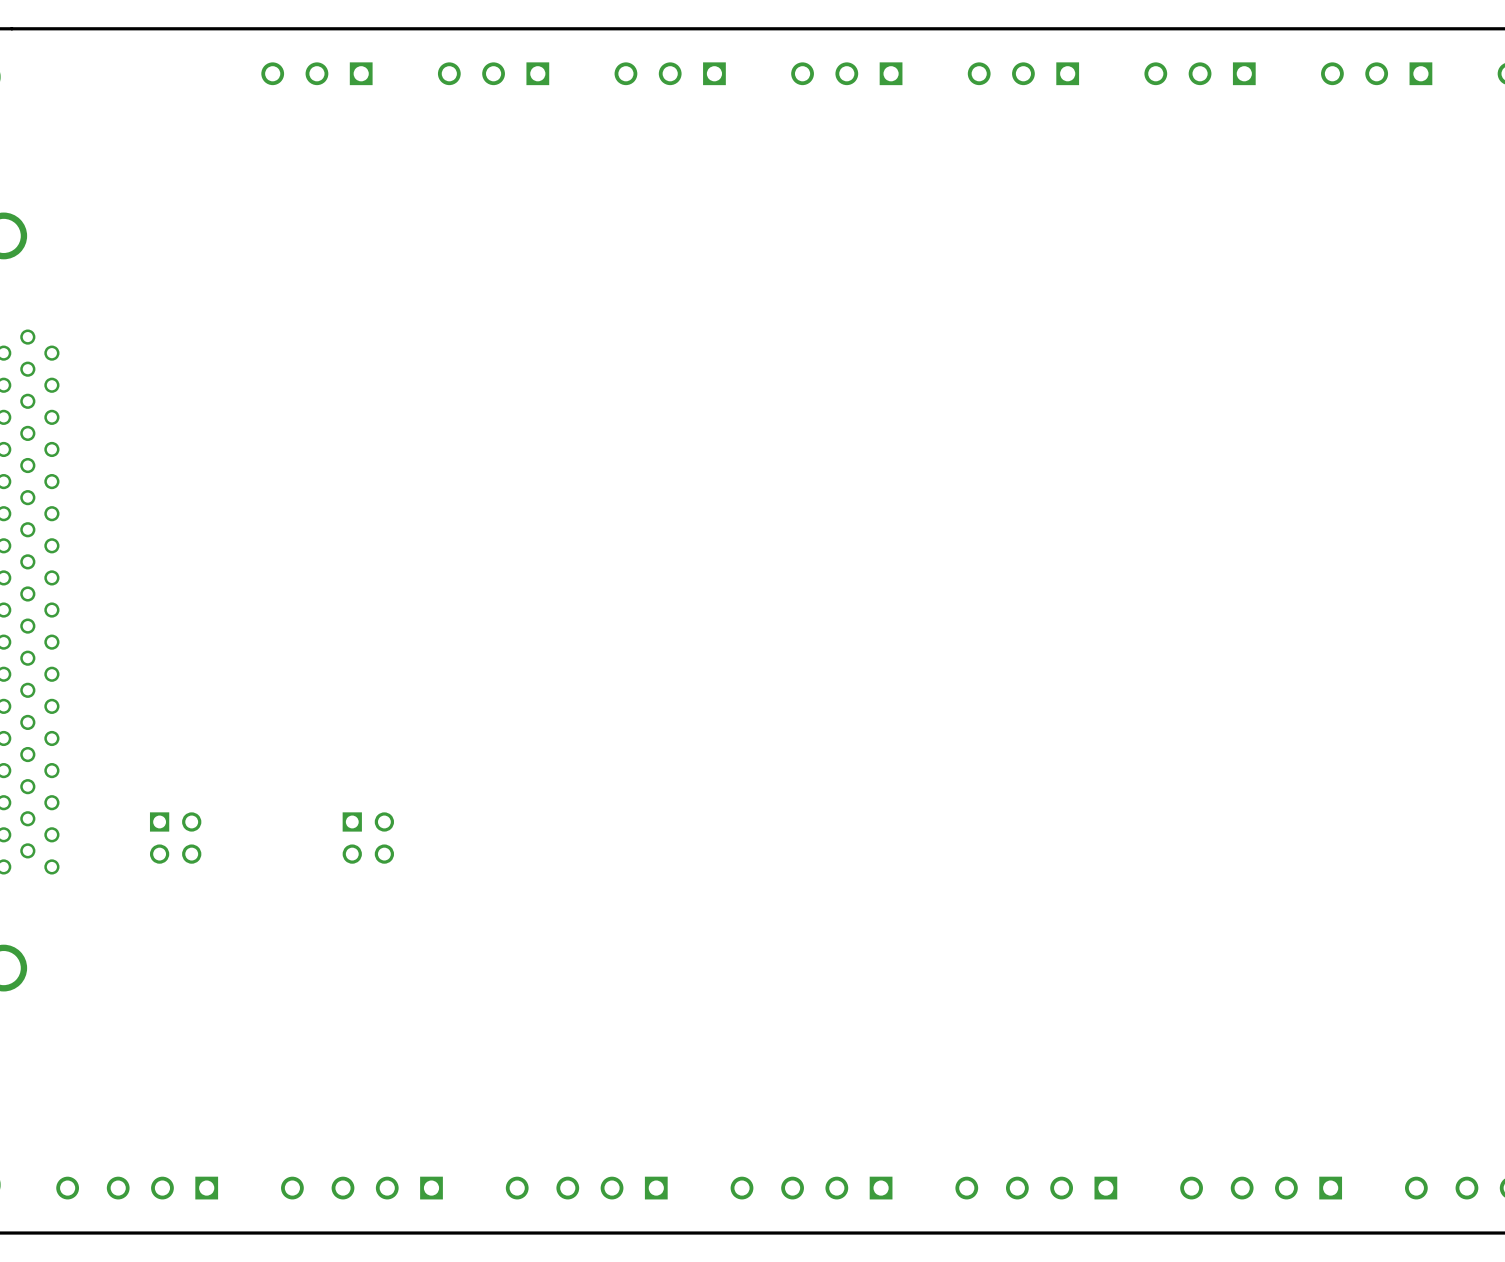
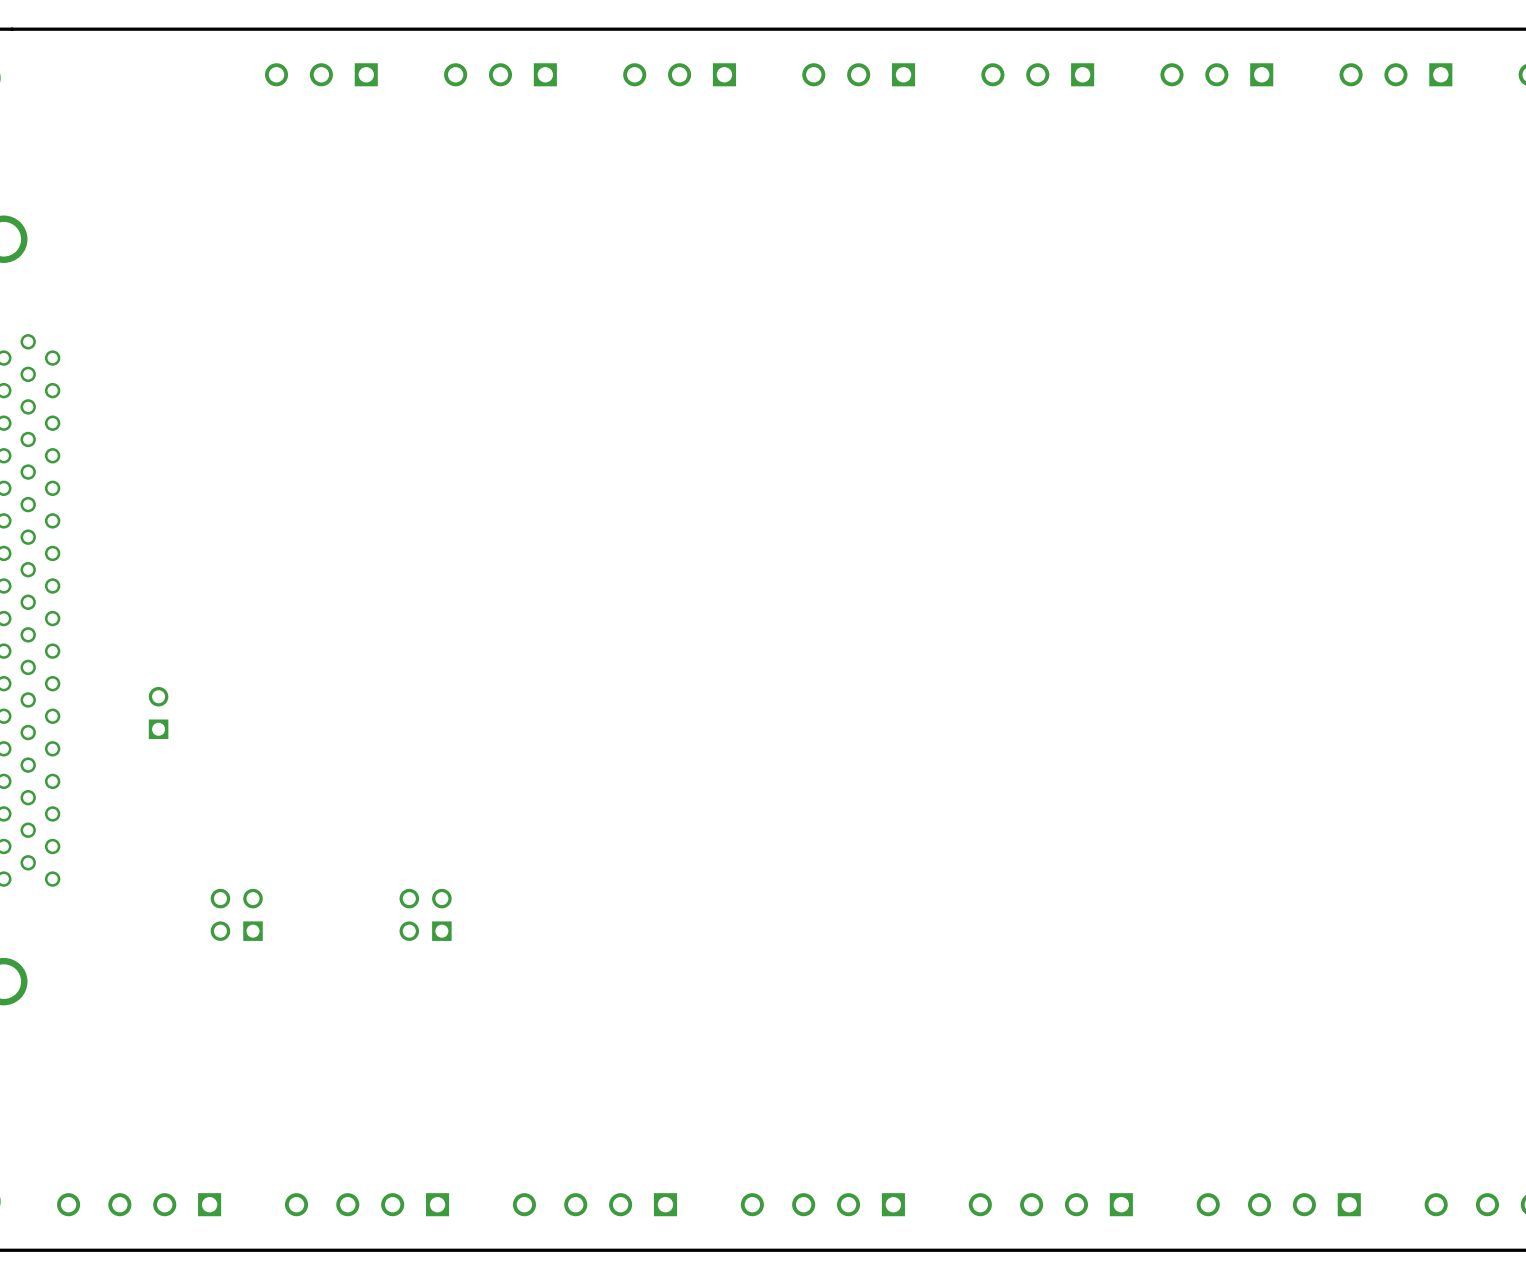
part: none -> (158, 713)
part: (175, 838) -> none
part: (368, 838) -> none
part: none -> (236, 914)
part: none -> (425, 914)

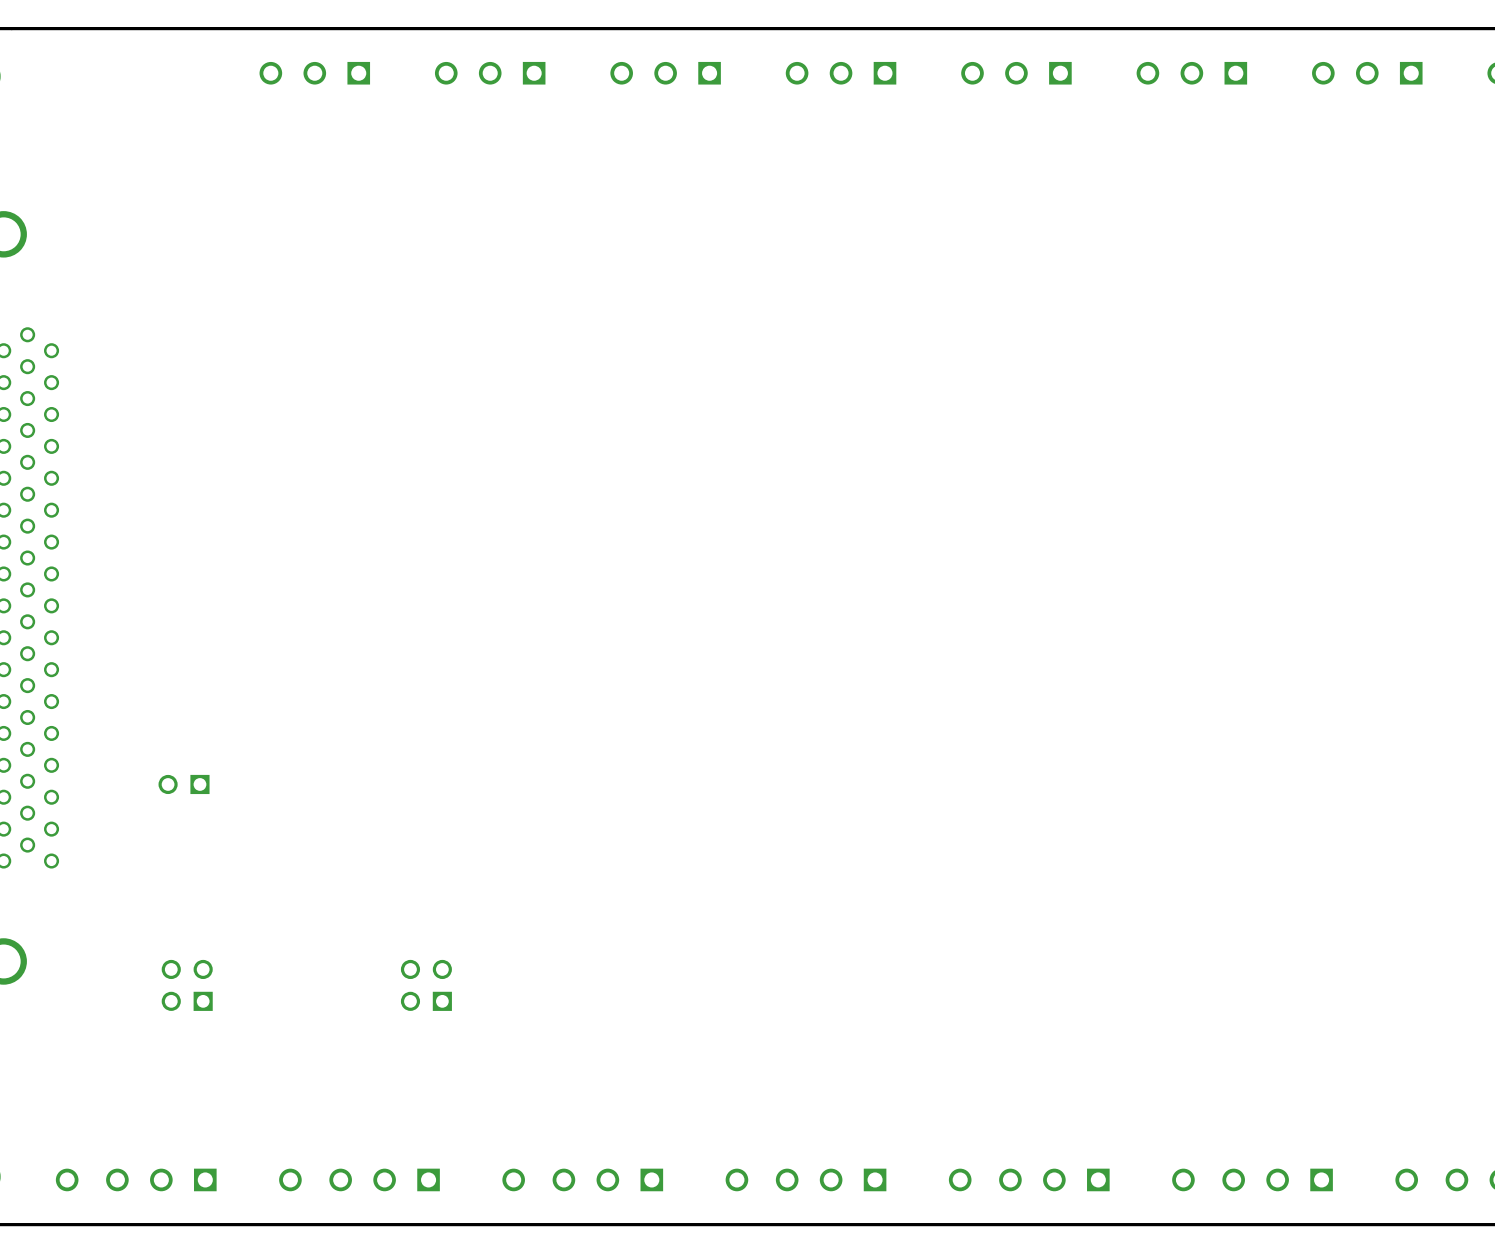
part rotation: 0° (158, 713) -> 90° counterclockwise (184, 784)
part position: (158, 713) -> (184, 784)
part position: (236, 914) -> (187, 985)
part position: (425, 914) -> (426, 985)

